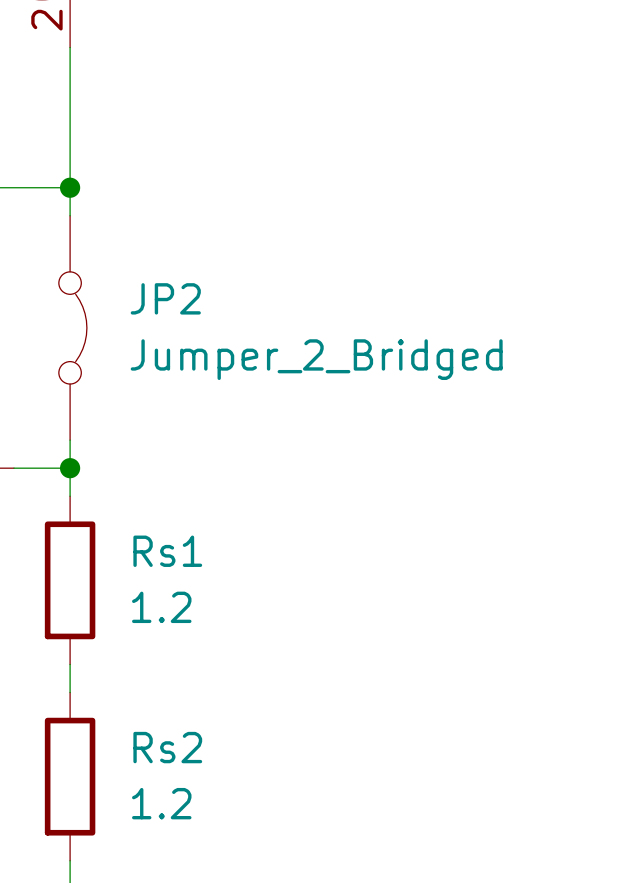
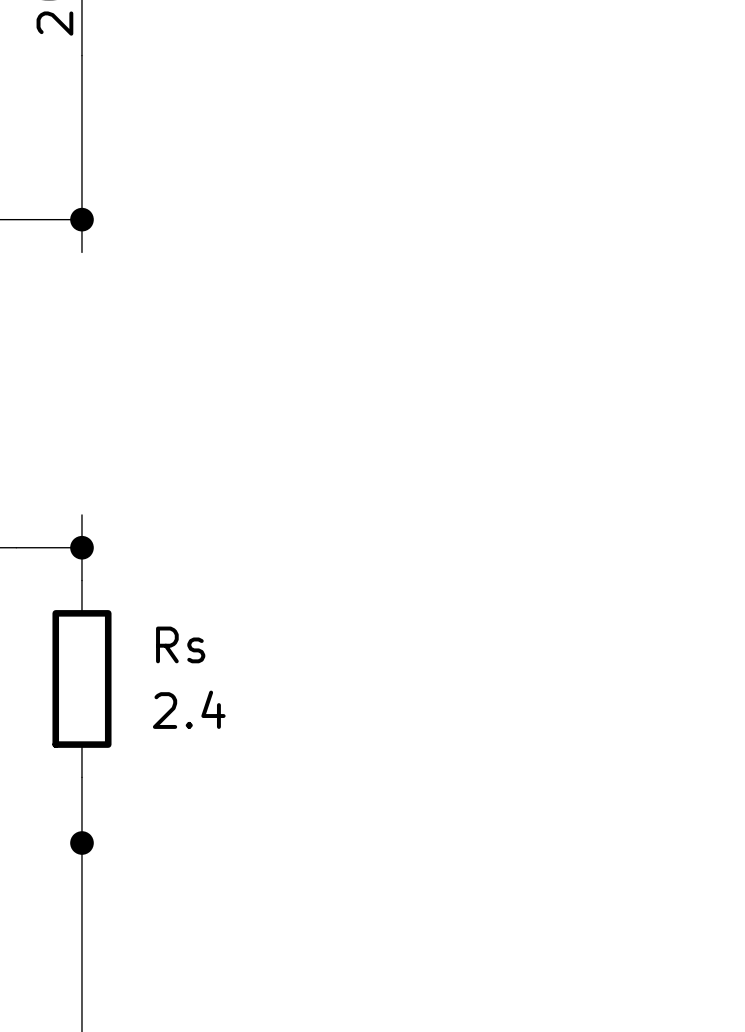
JP2: Jumper_2_Bridged (72, 327) -> none
Rs1 name: Rs1 (167, 551) -> Rs (180, 644)
Rs1 value: 1.2 (161, 607) -> 2.4 (189, 709)
wire: none -> (81, 810) (81, 1007)
junction: none -> (81, 843)
Rs2: 1.2 (70, 776) -> none

